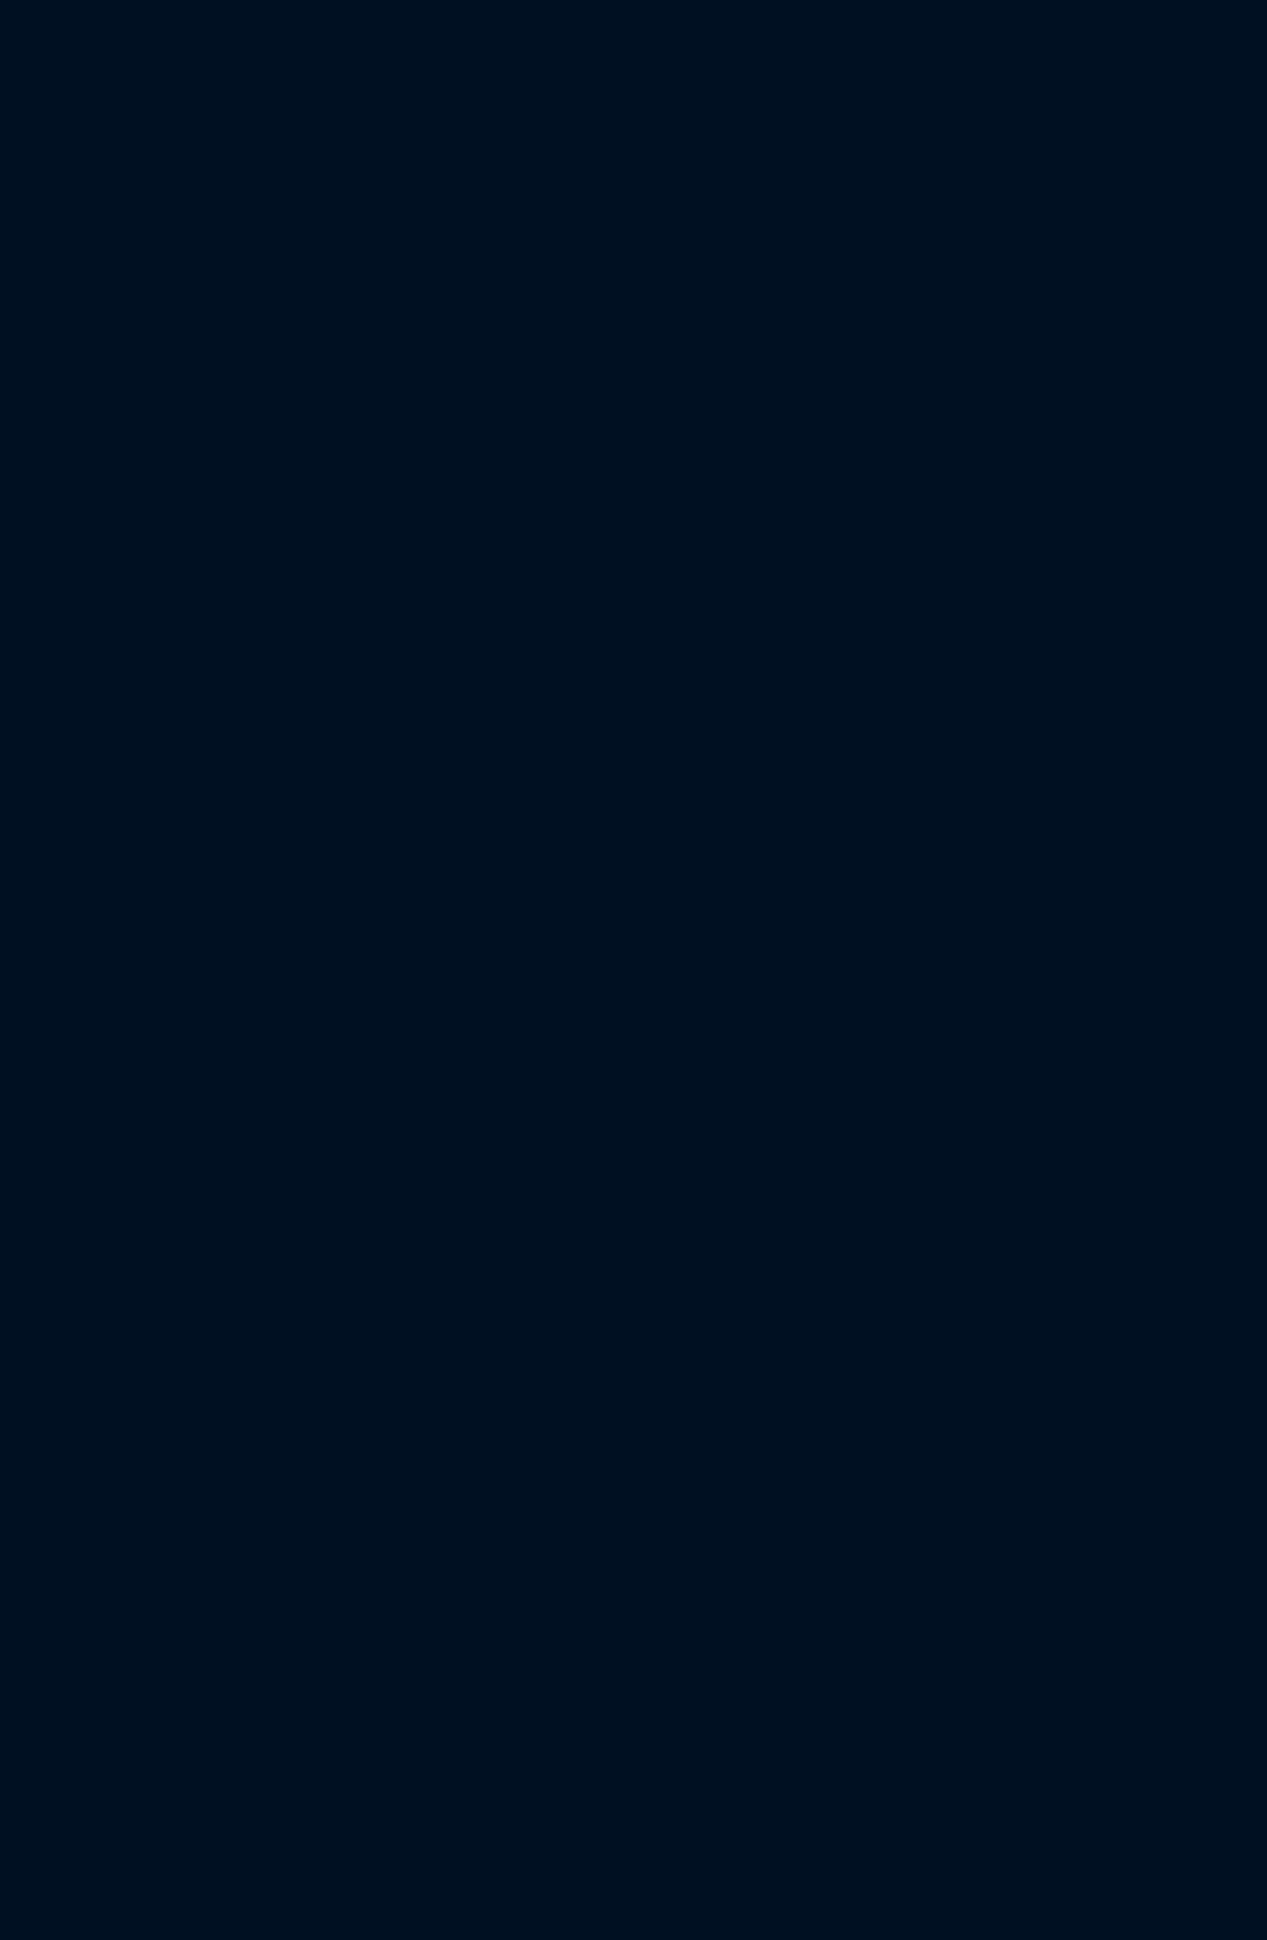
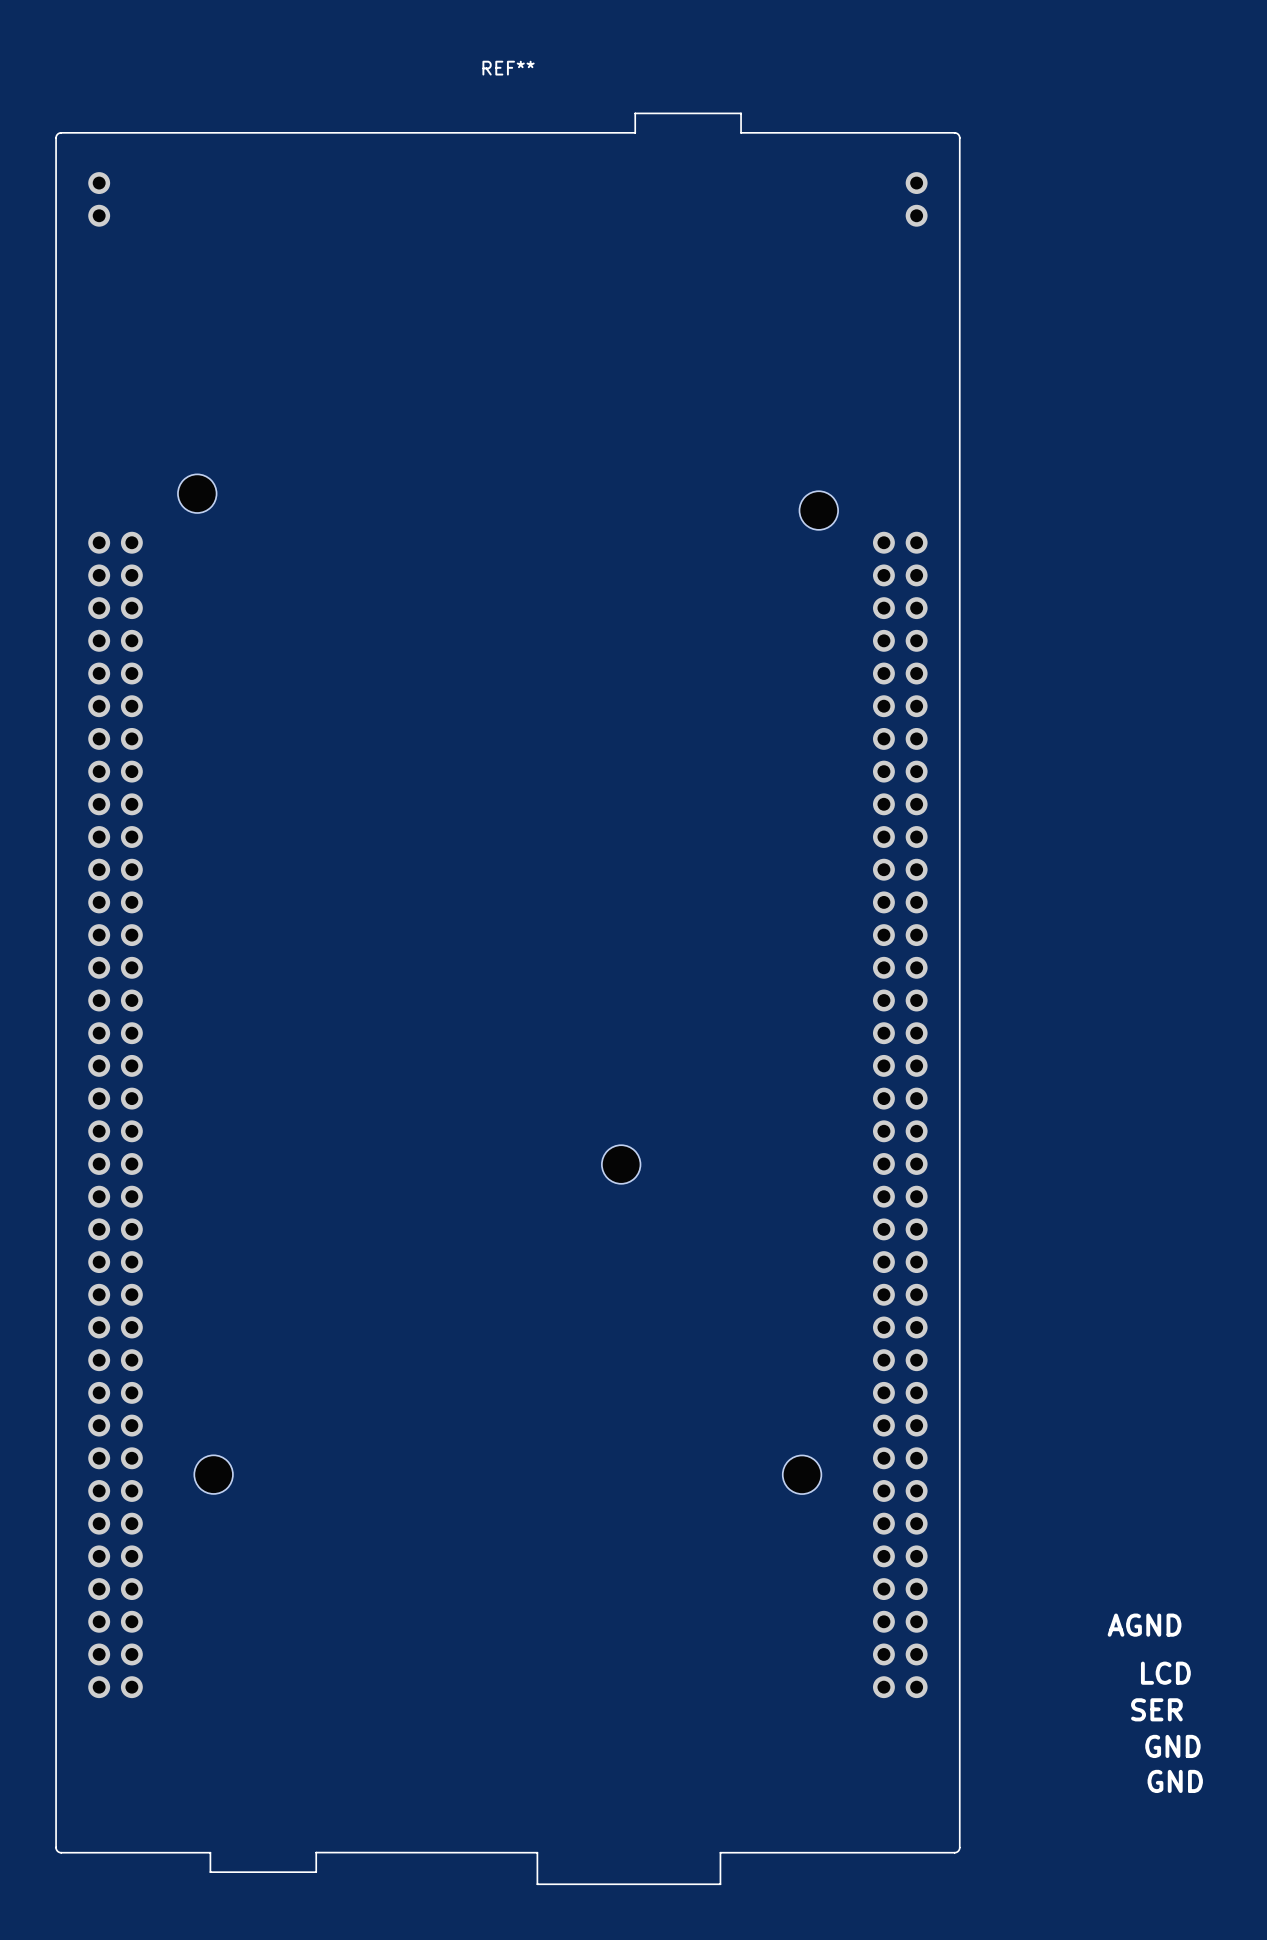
REF**: none -> (507, 998)
text: none -> AGND (1144, 1625)
text: none -> LCD (1165, 1673)
text: none -> SER (1156, 1709)
text: none -> GND (1172, 1746)
text: none -> GND (1175, 1781)

